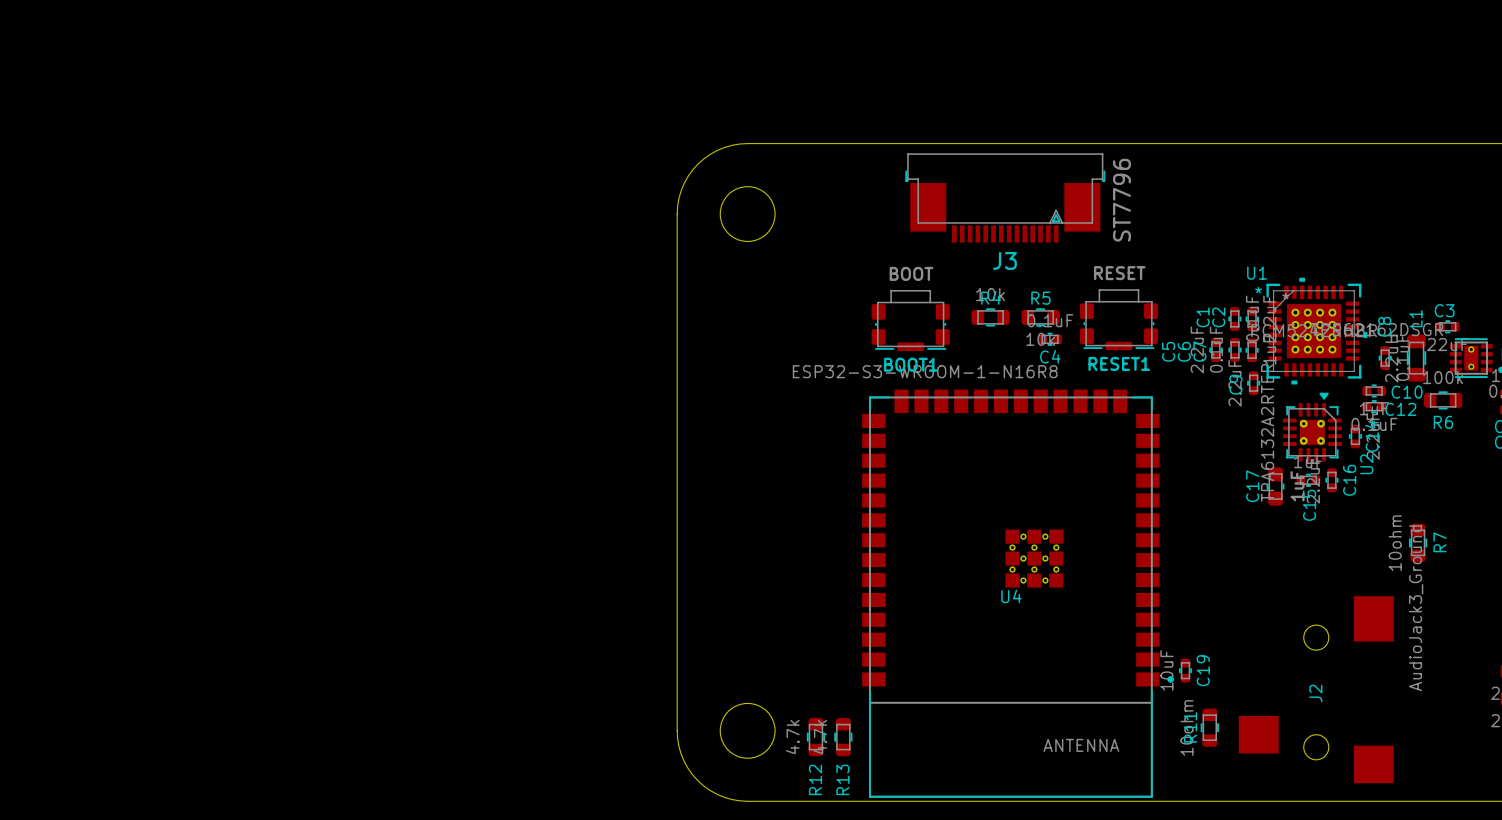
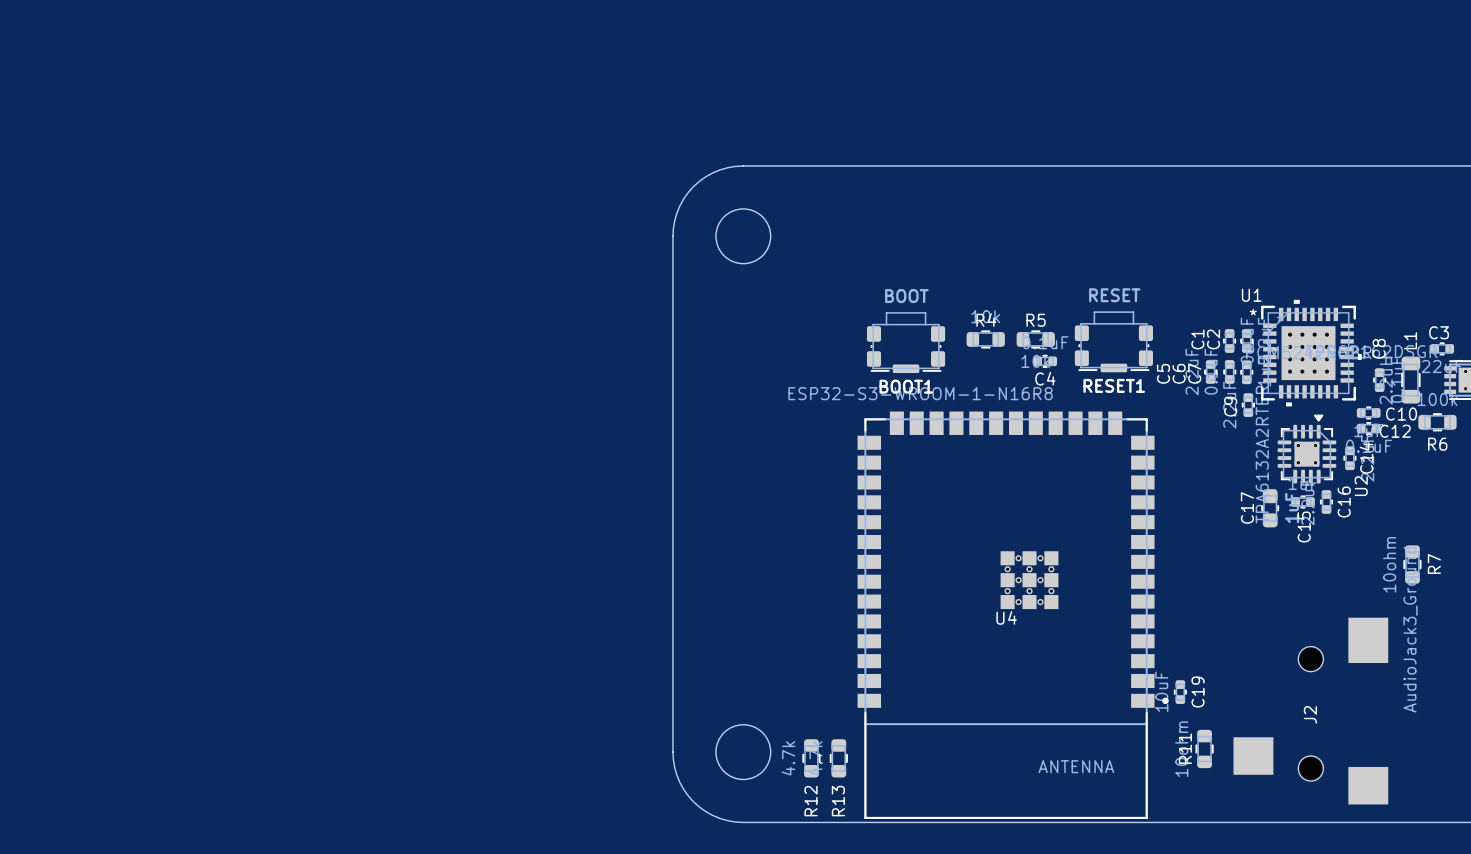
J3: ST7796 (1005, 197) -> none

